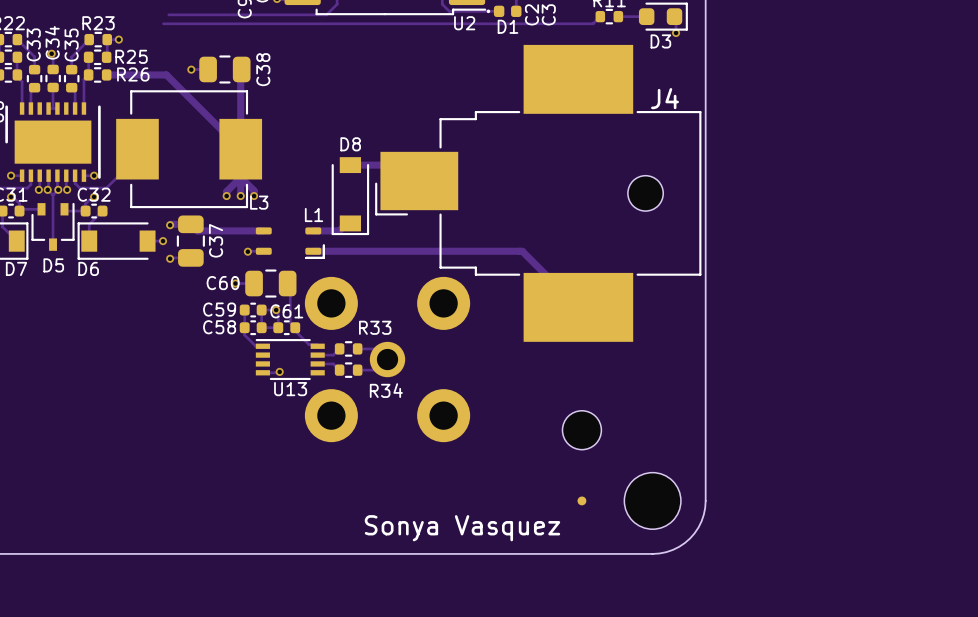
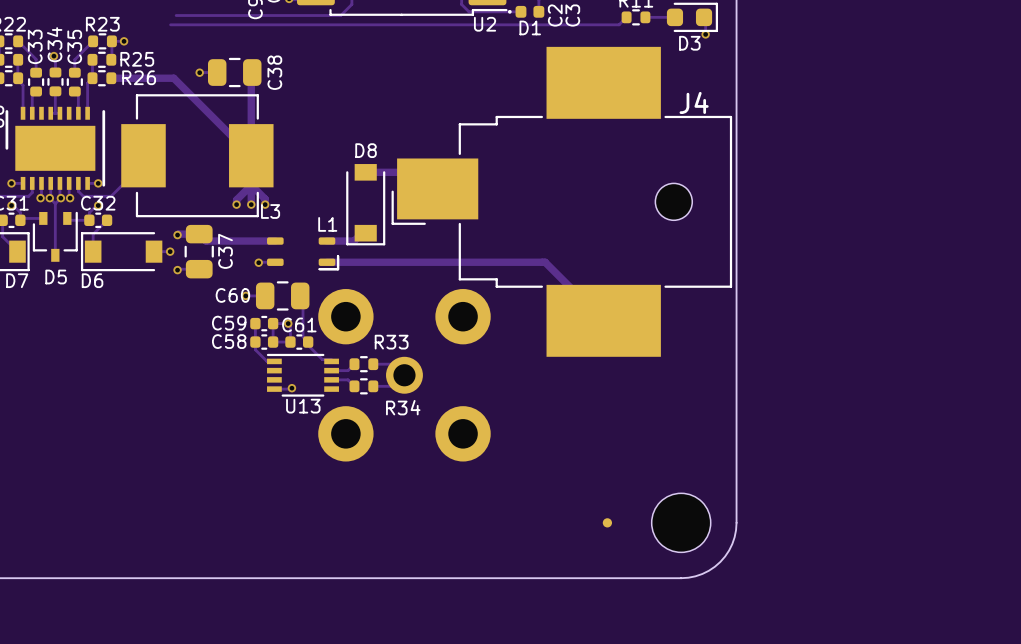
part: (581, 430) -> none
text: Sonya Vasquez (462, 528) -> none

